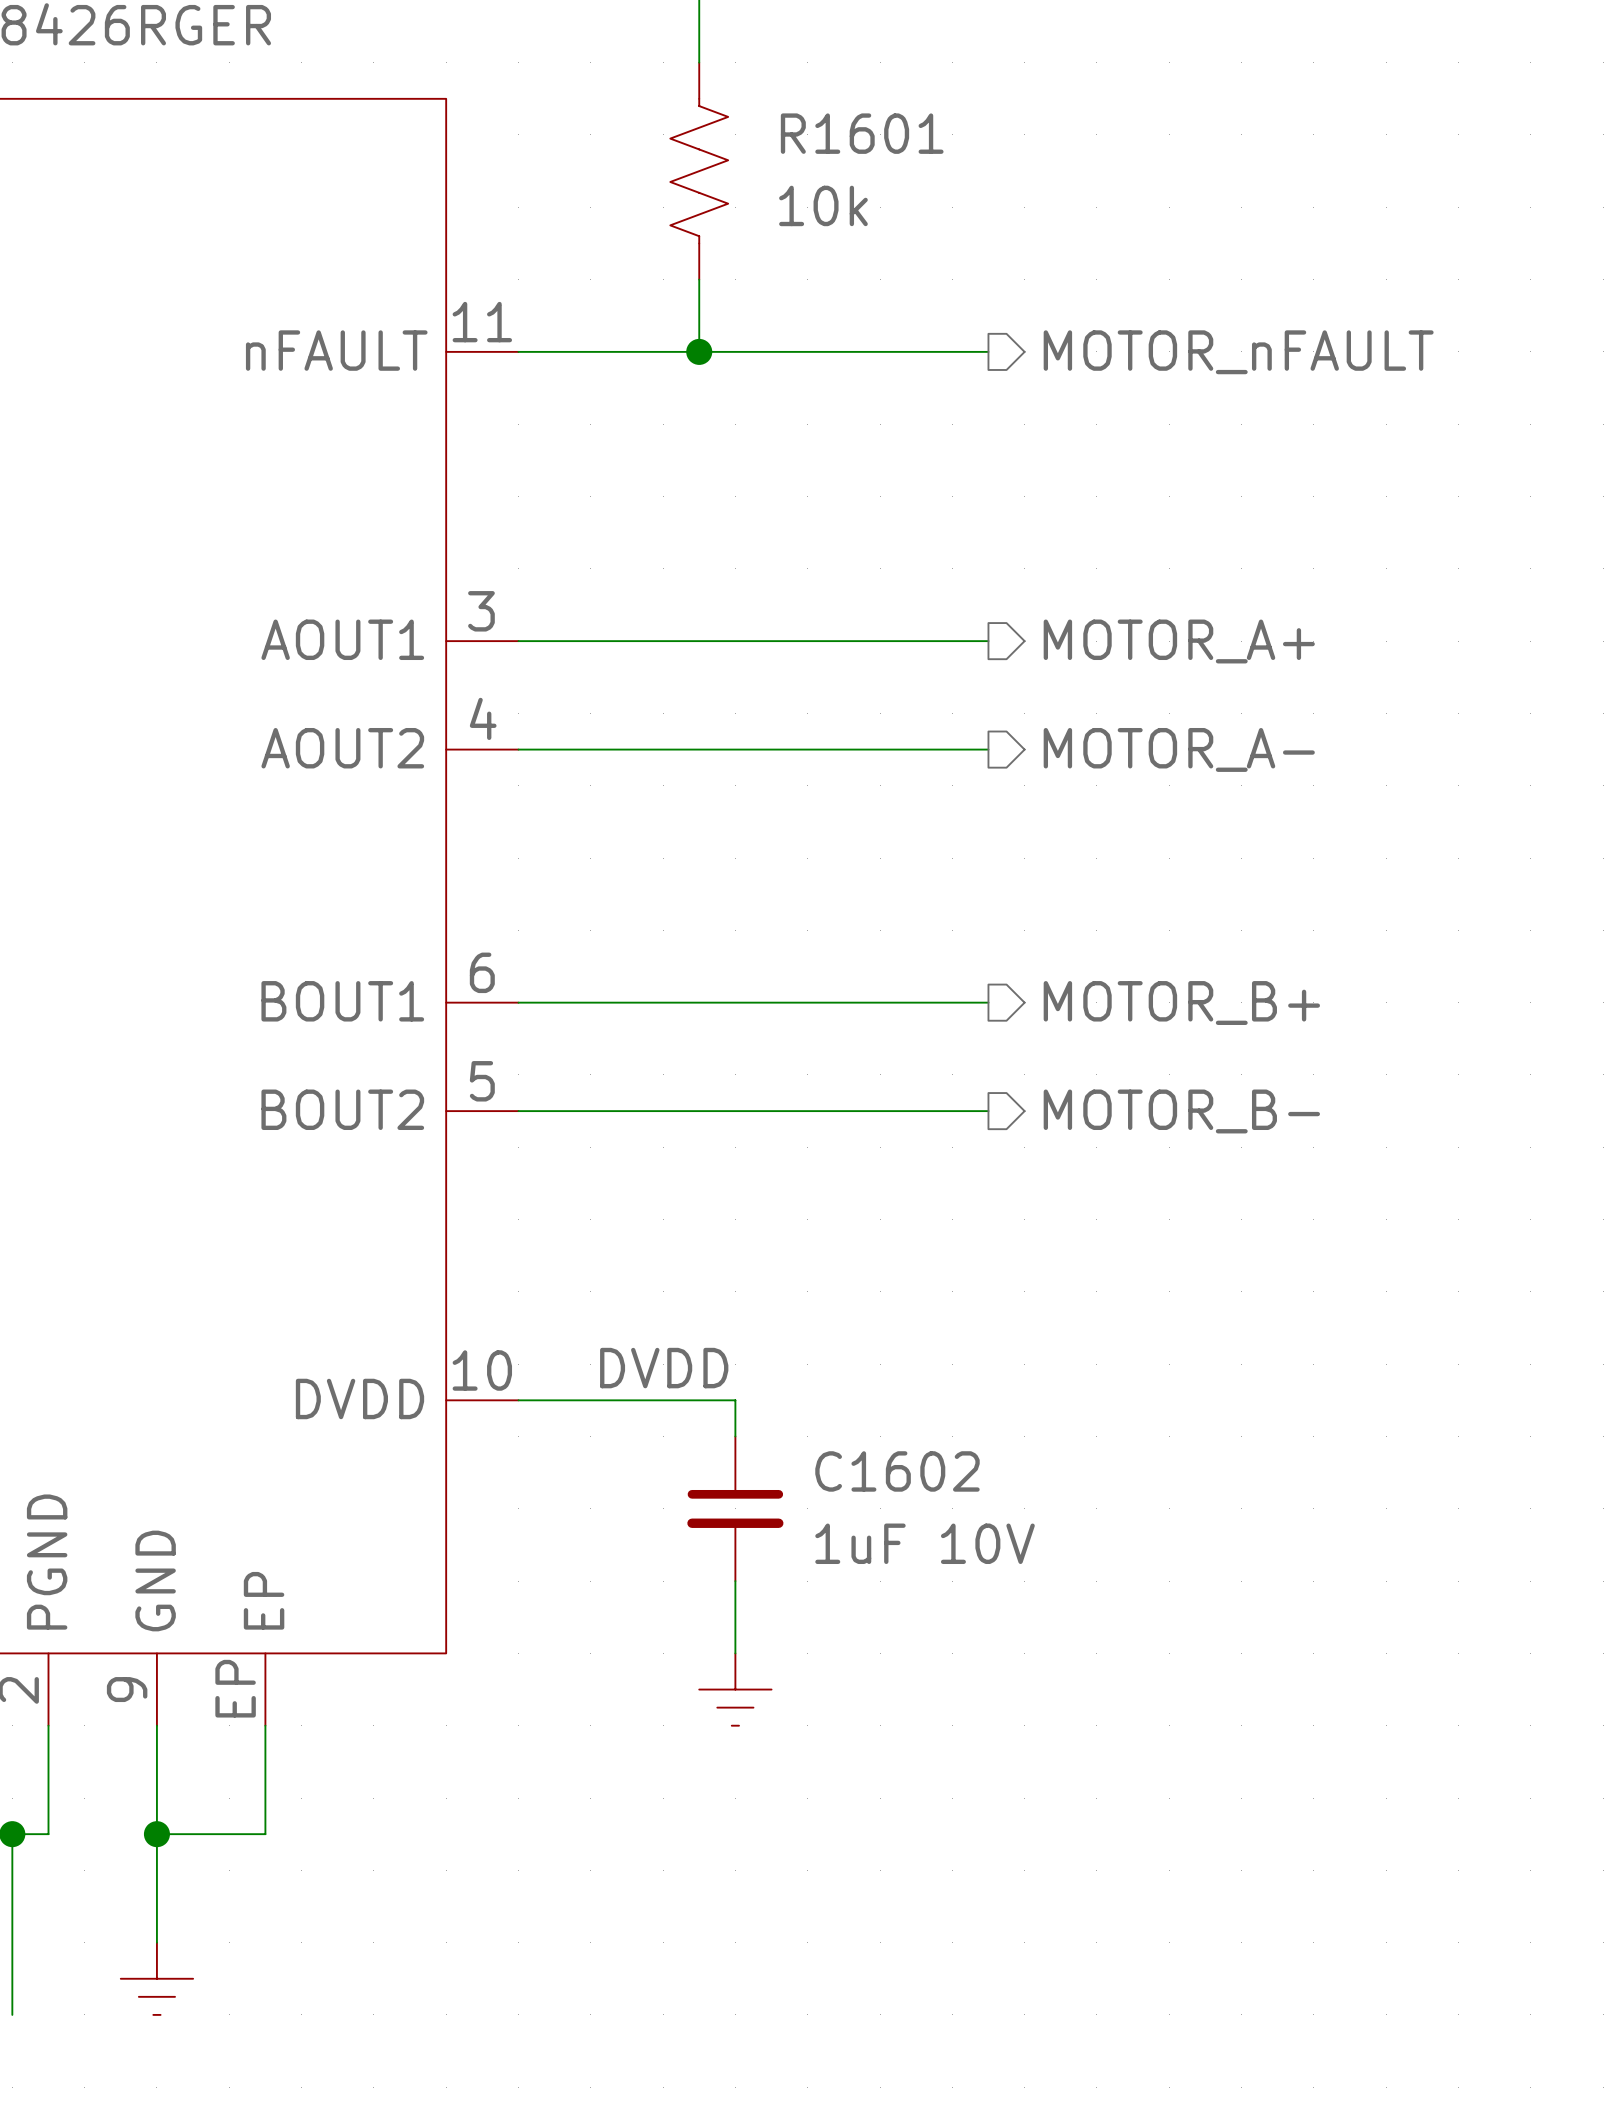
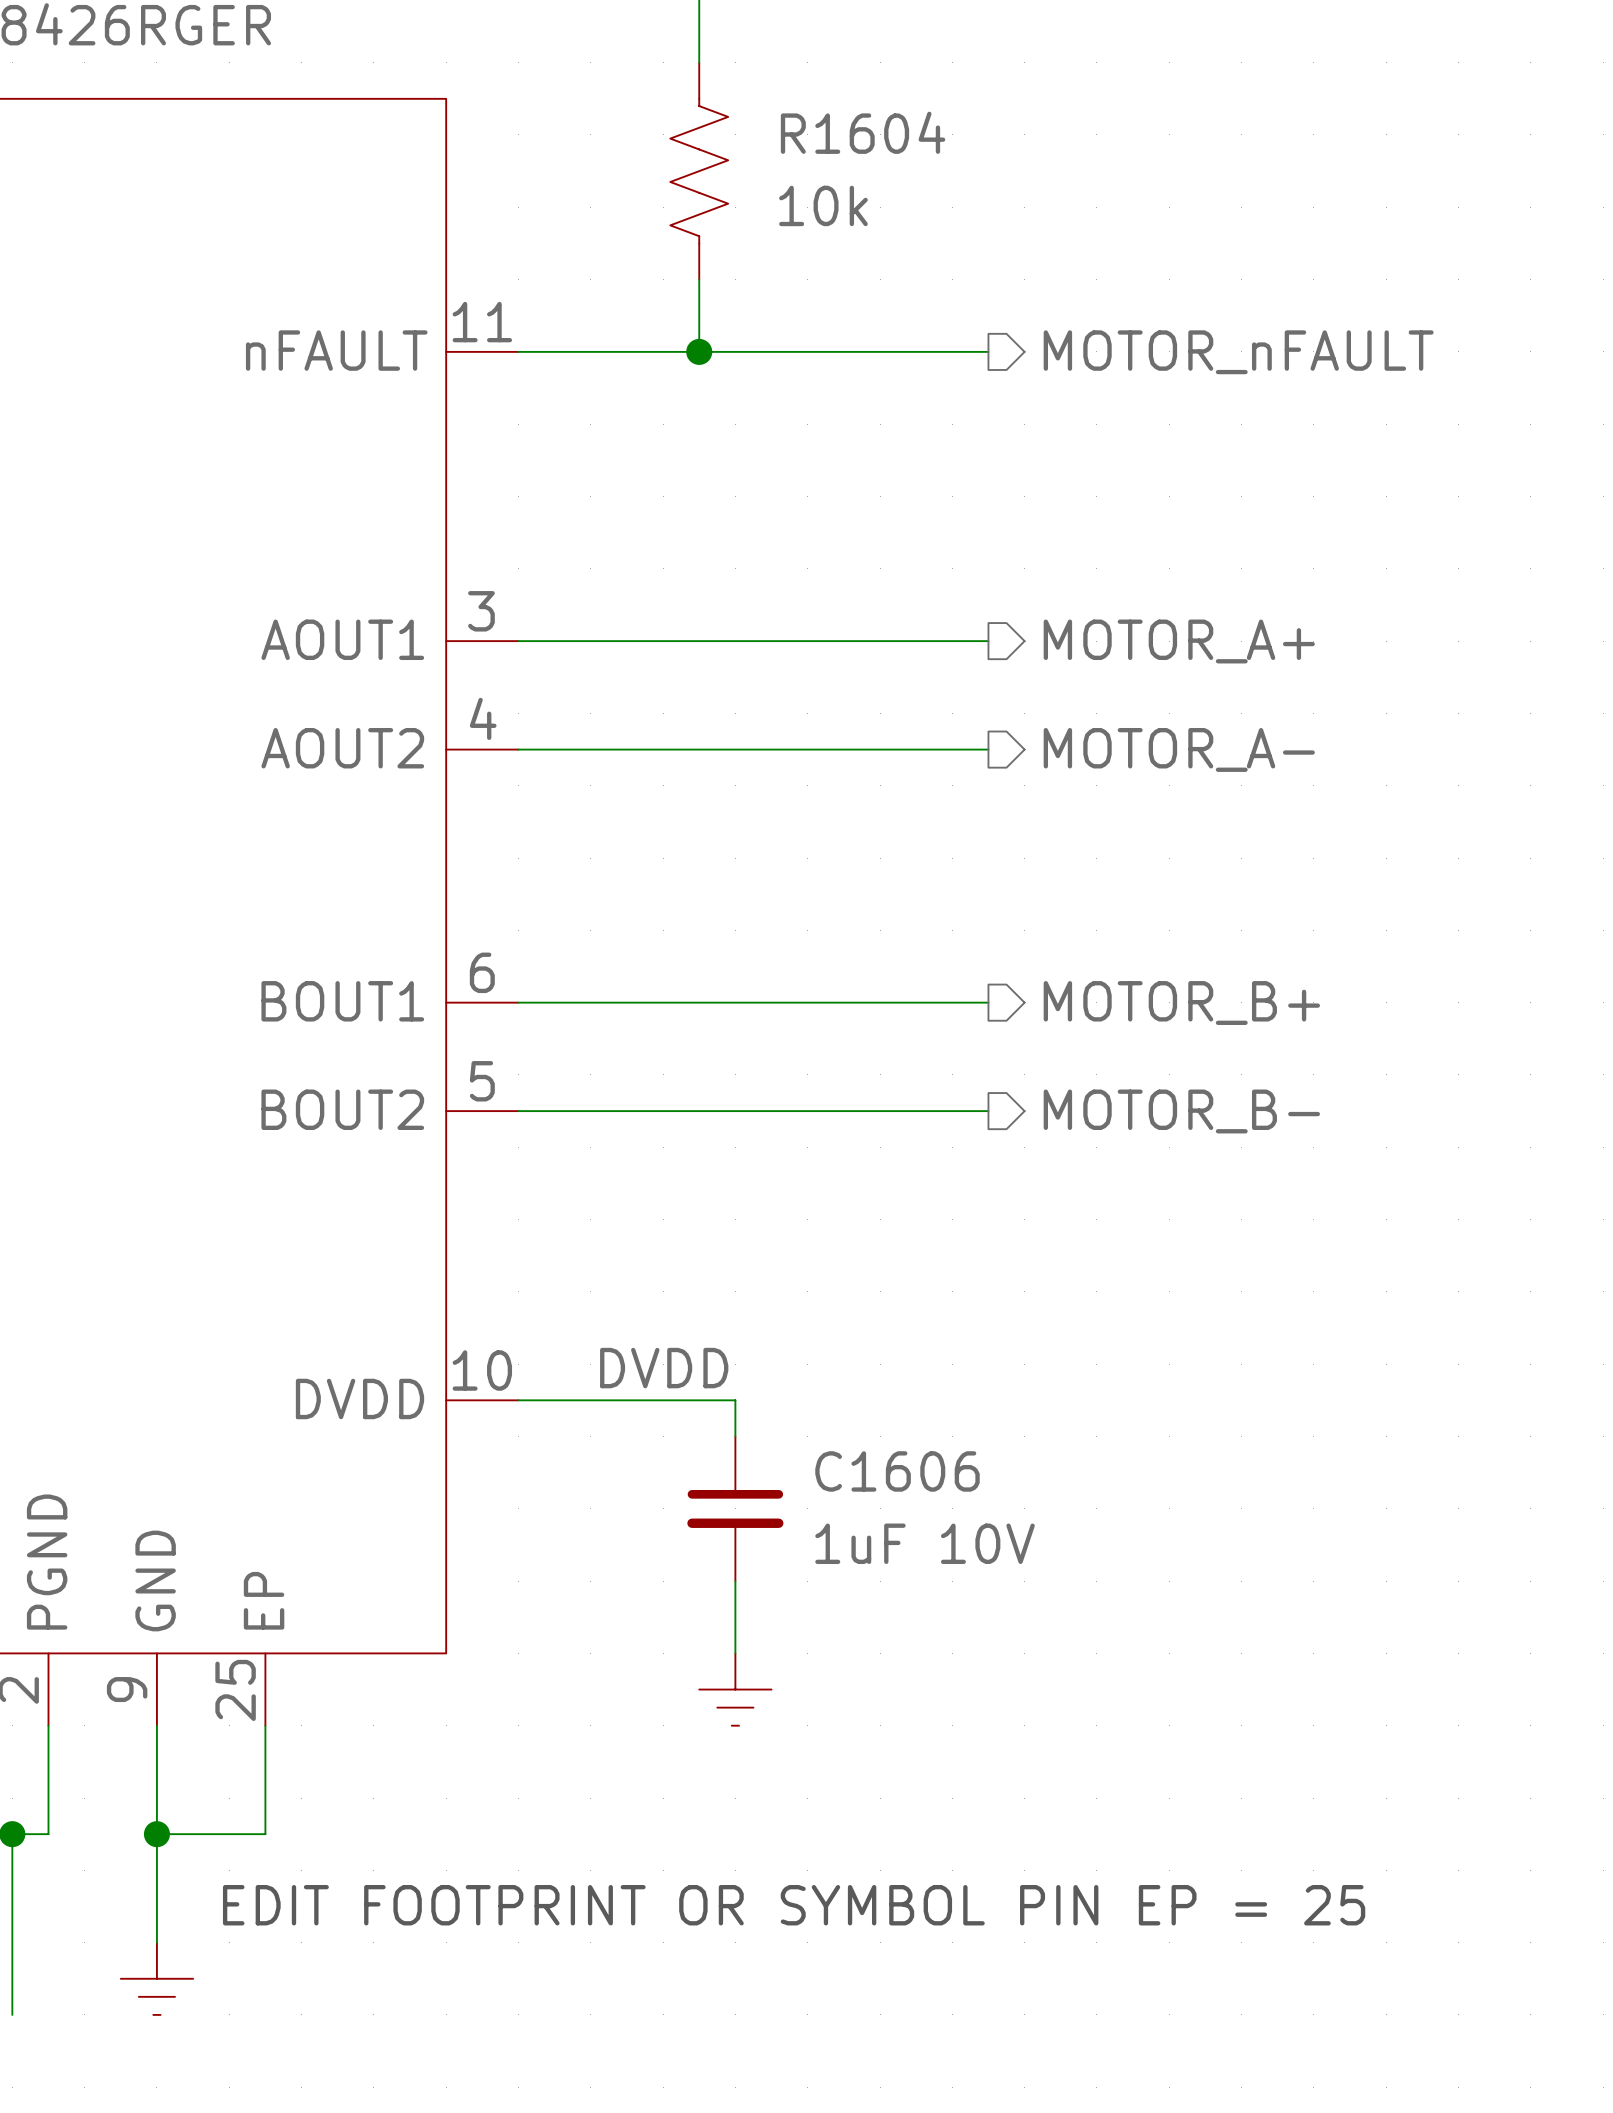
R1601 name: R1601 (862, 133) -> R1604 (863, 132)
C1602 name: C1602 (897, 1471) -> C1606 (897, 1471)
part pin number: EP (235, 1688) -> 25 (235, 1690)
text: none -> EDIT FOOTPRINT OR SYMBOL PIN EP = 25 (794, 1905)

